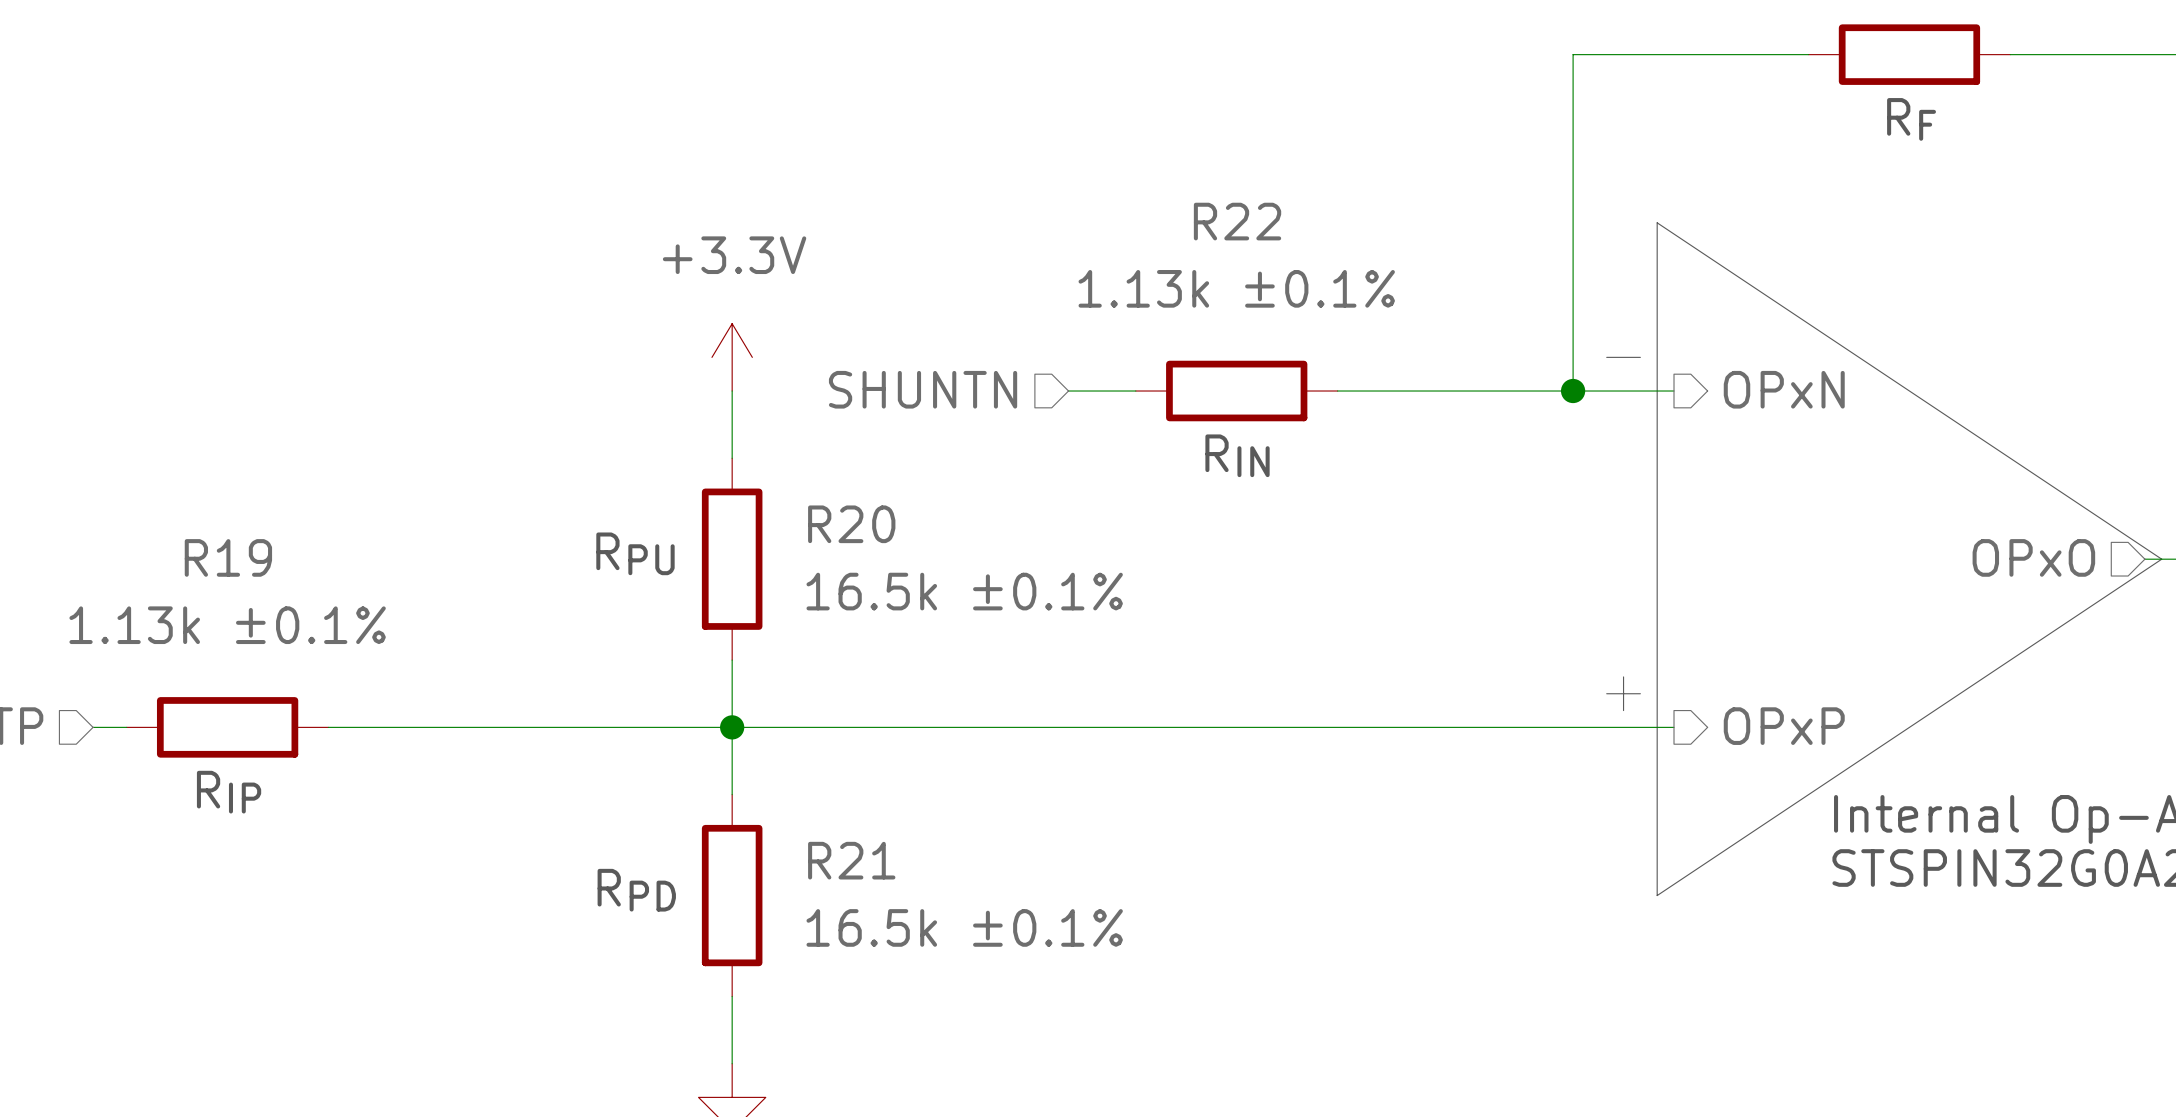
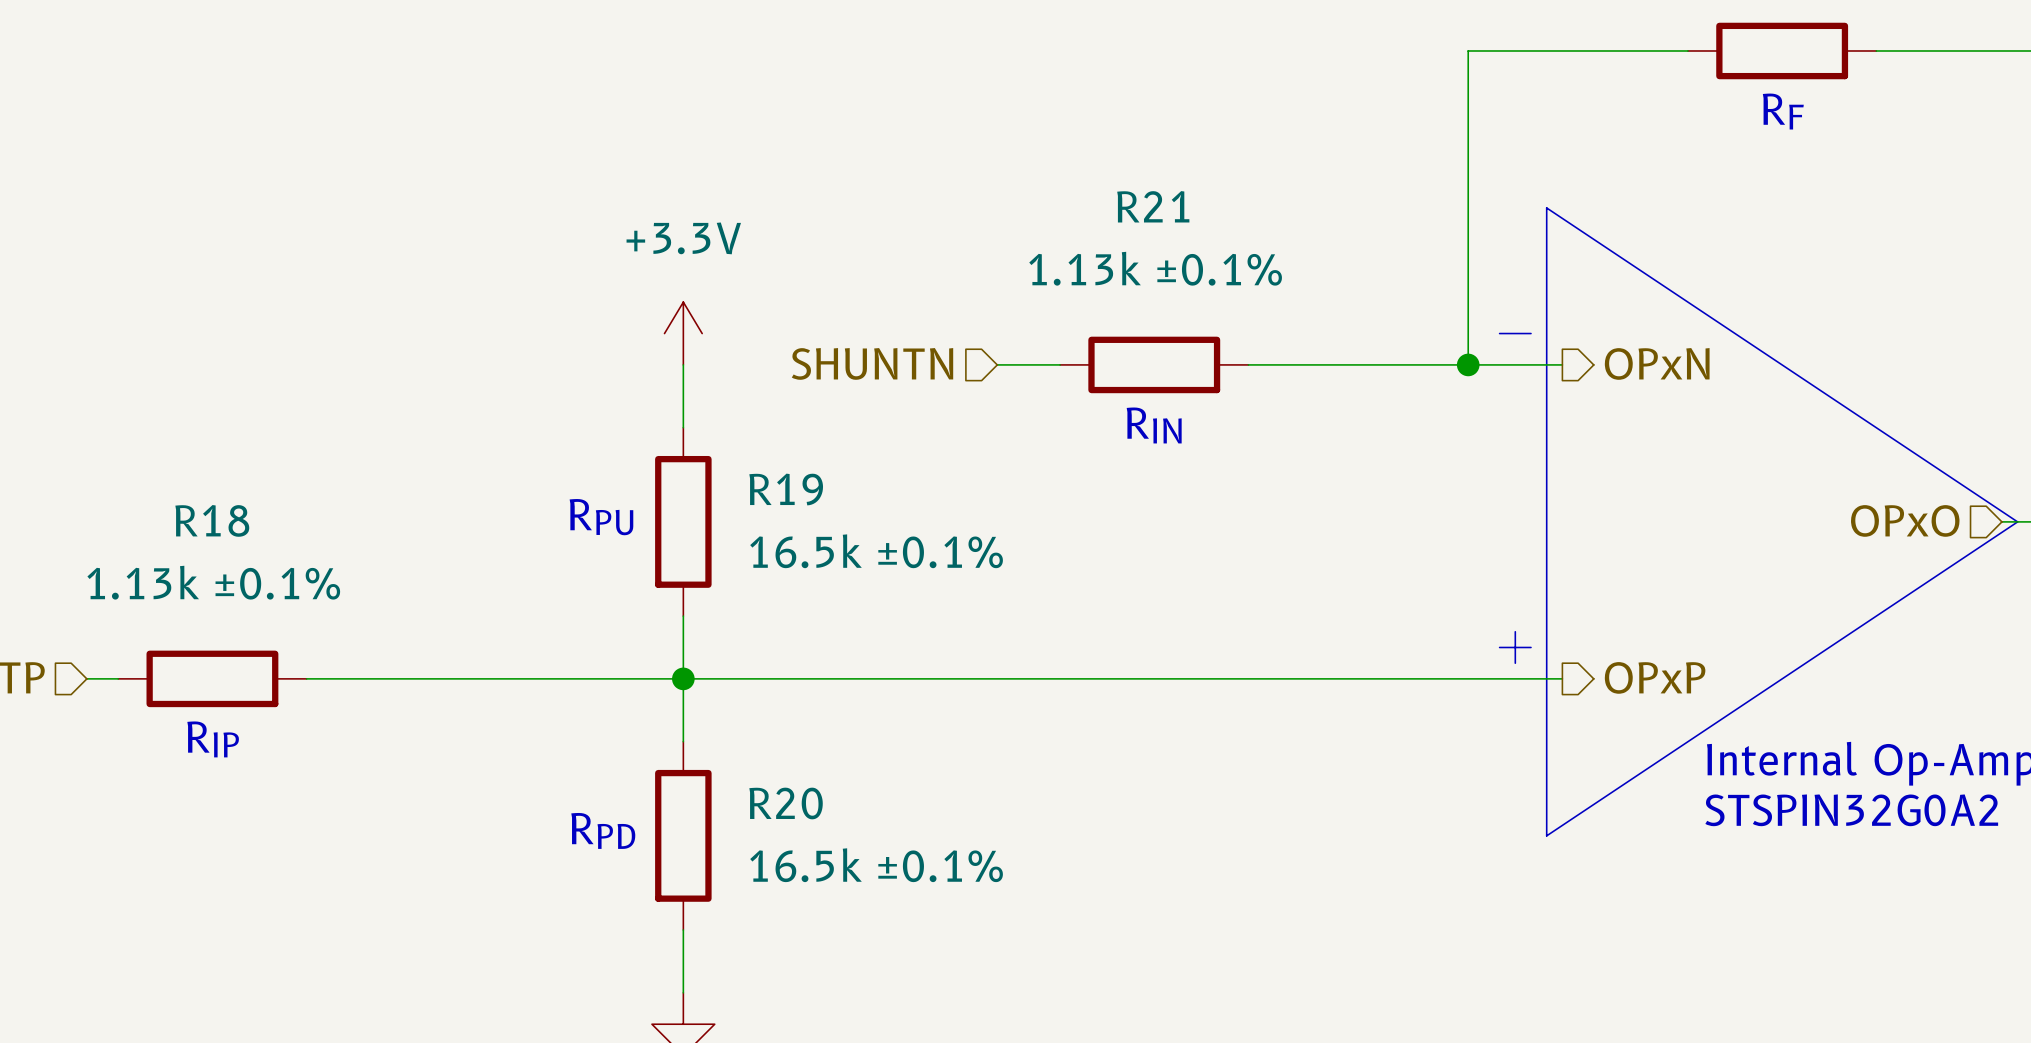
R22 name: R22 (1237, 221) -> R21 (1153, 206)
R20 name: R20 (851, 524) -> R19 (786, 489)
R19 name: R19 (228, 557) -> R18 (212, 520)
R21 name: R21 (851, 860) -> R20 (786, 803)

